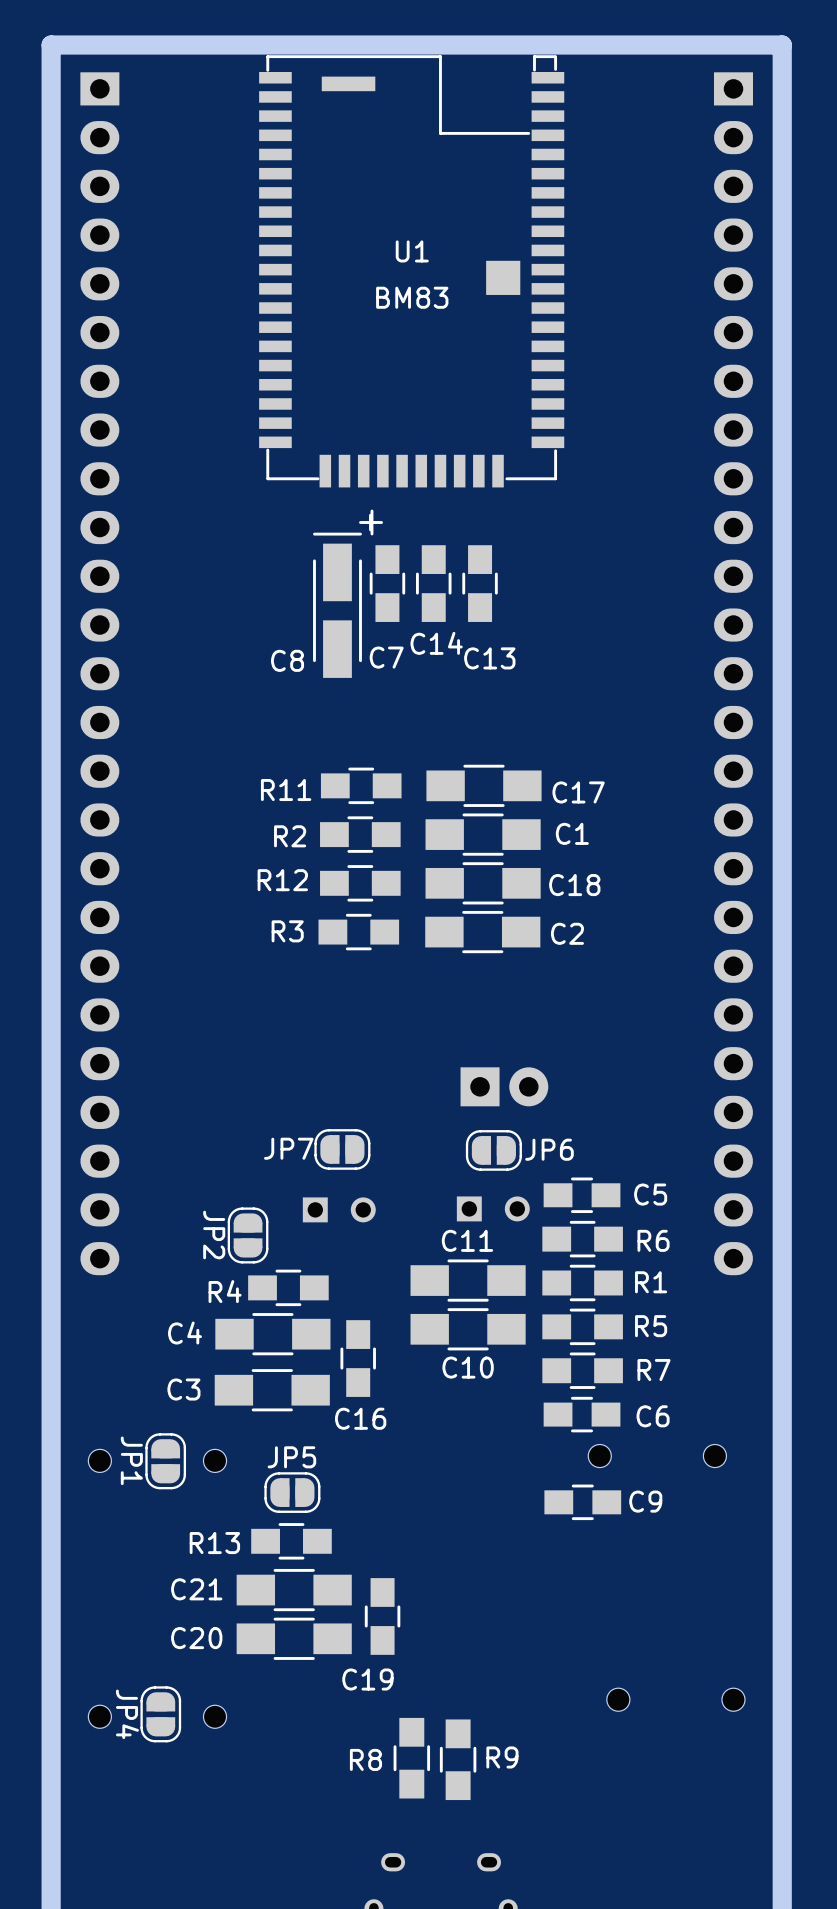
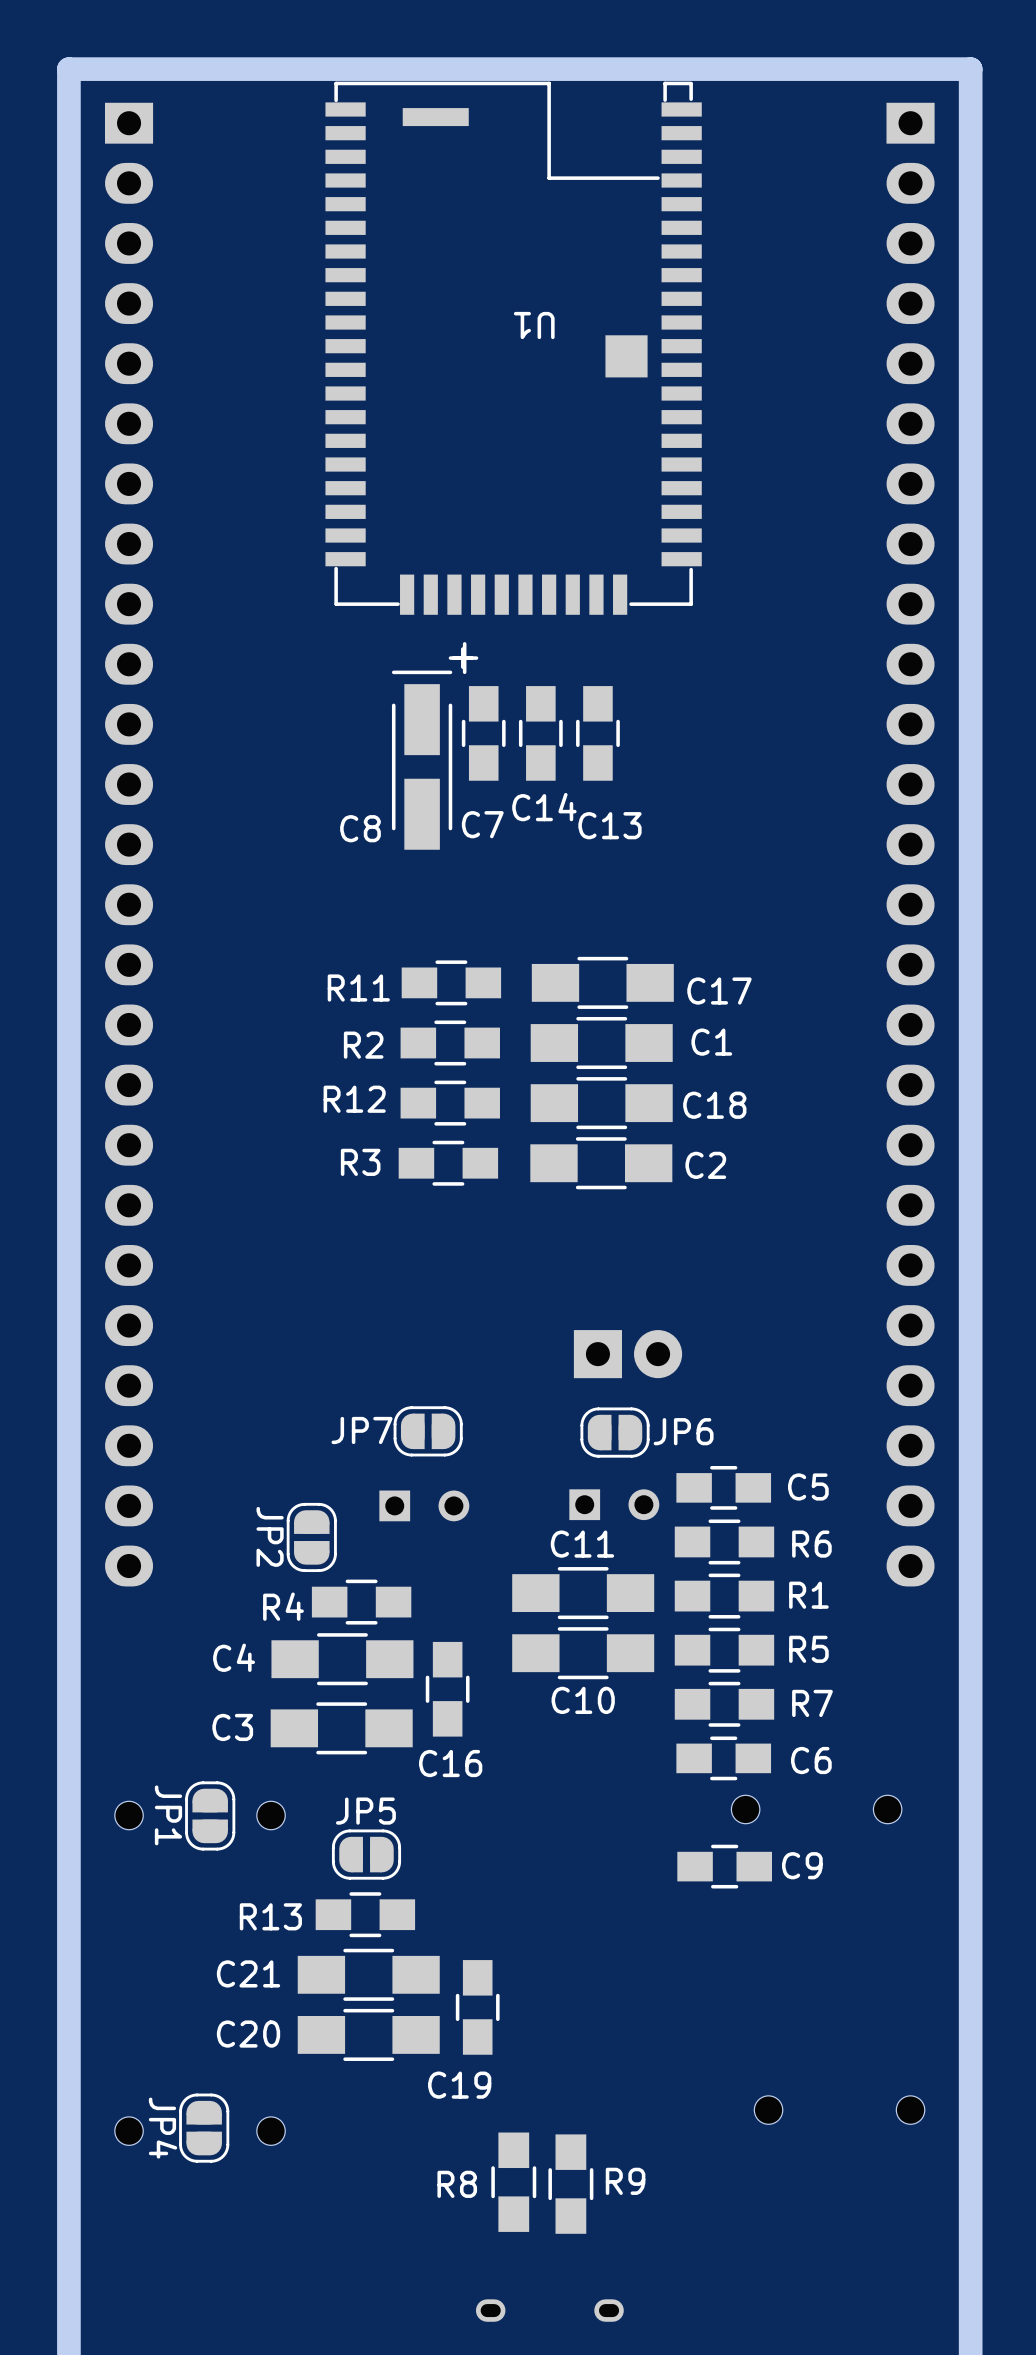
U1 name rotation: 0° (412, 251) -> 180° (534, 325)
U1 value: BM83 (412, 297) -> none

